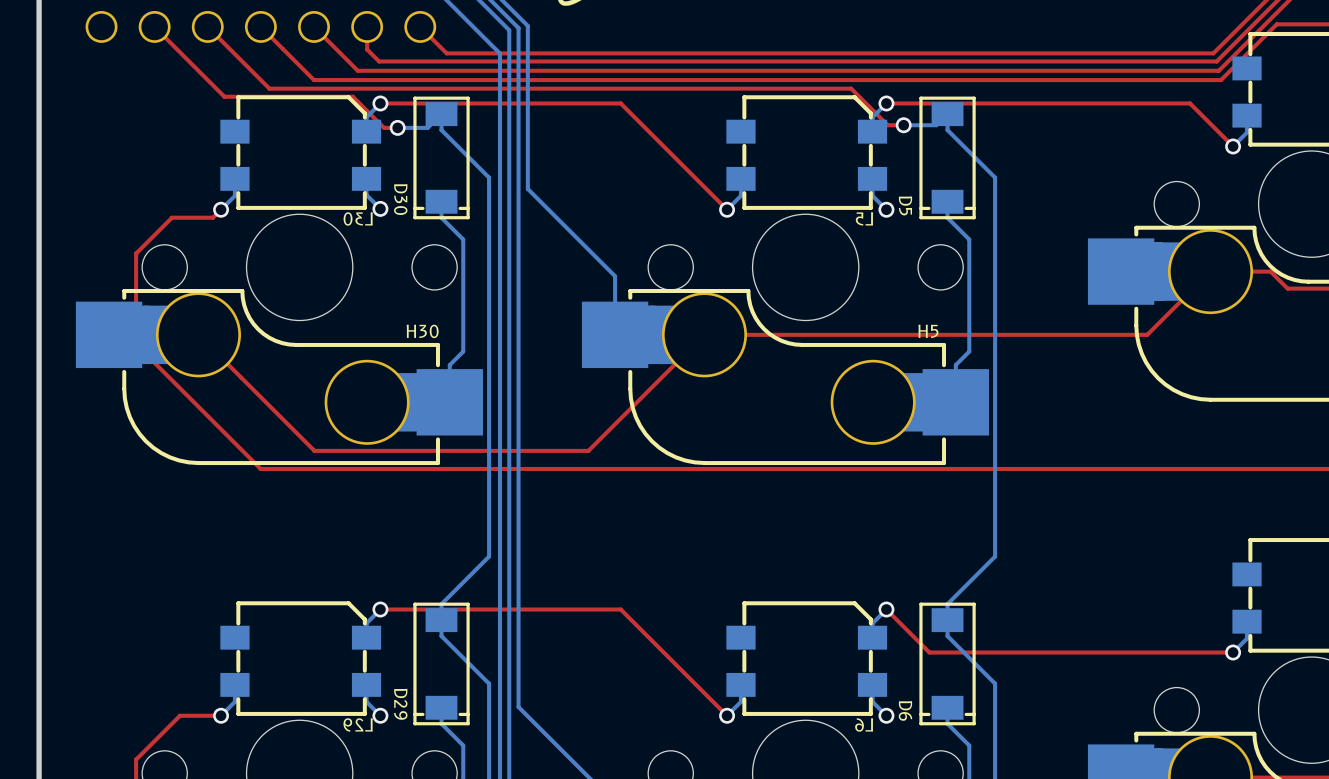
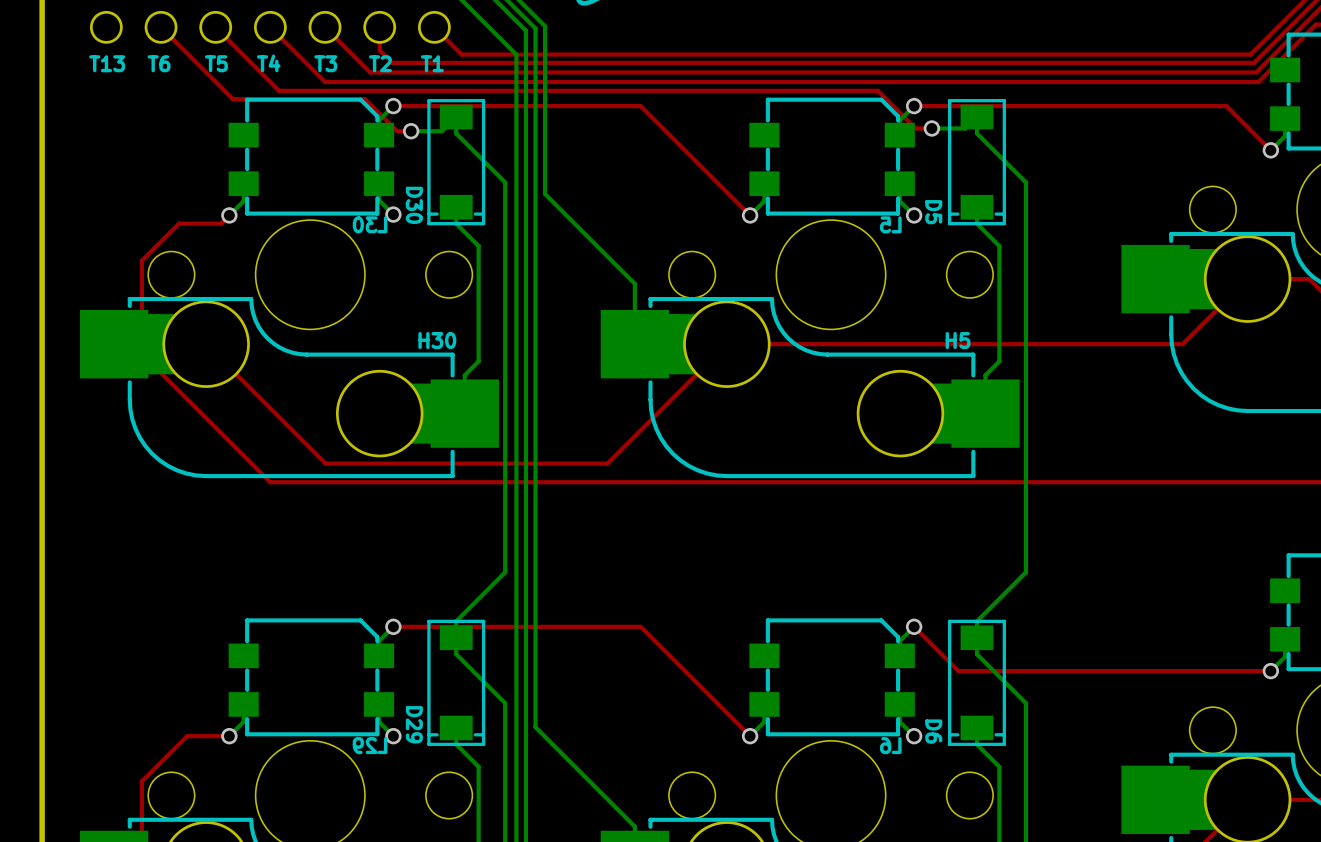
T13 name: none -> T13 (107, 63)
T6 name: none -> T6 (159, 63)
T5 name: none -> T5 (216, 63)
T4 name: none -> T4 (268, 63)
T3 name: none -> T3 (325, 63)
T2 name: none -> T2 (380, 63)
T1 name: none -> T1 (432, 63)

